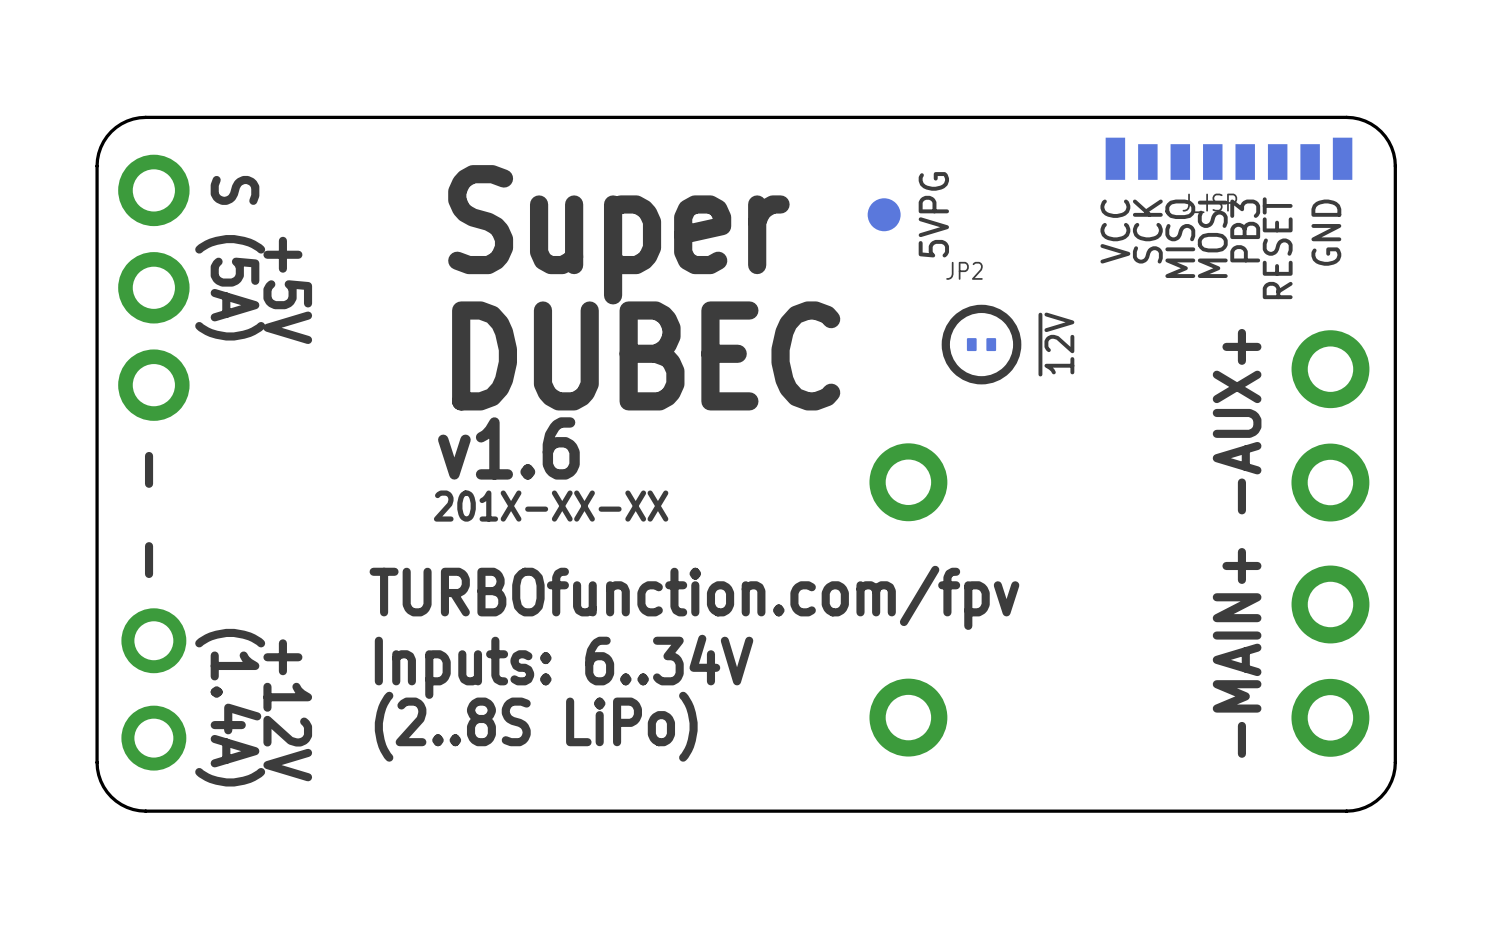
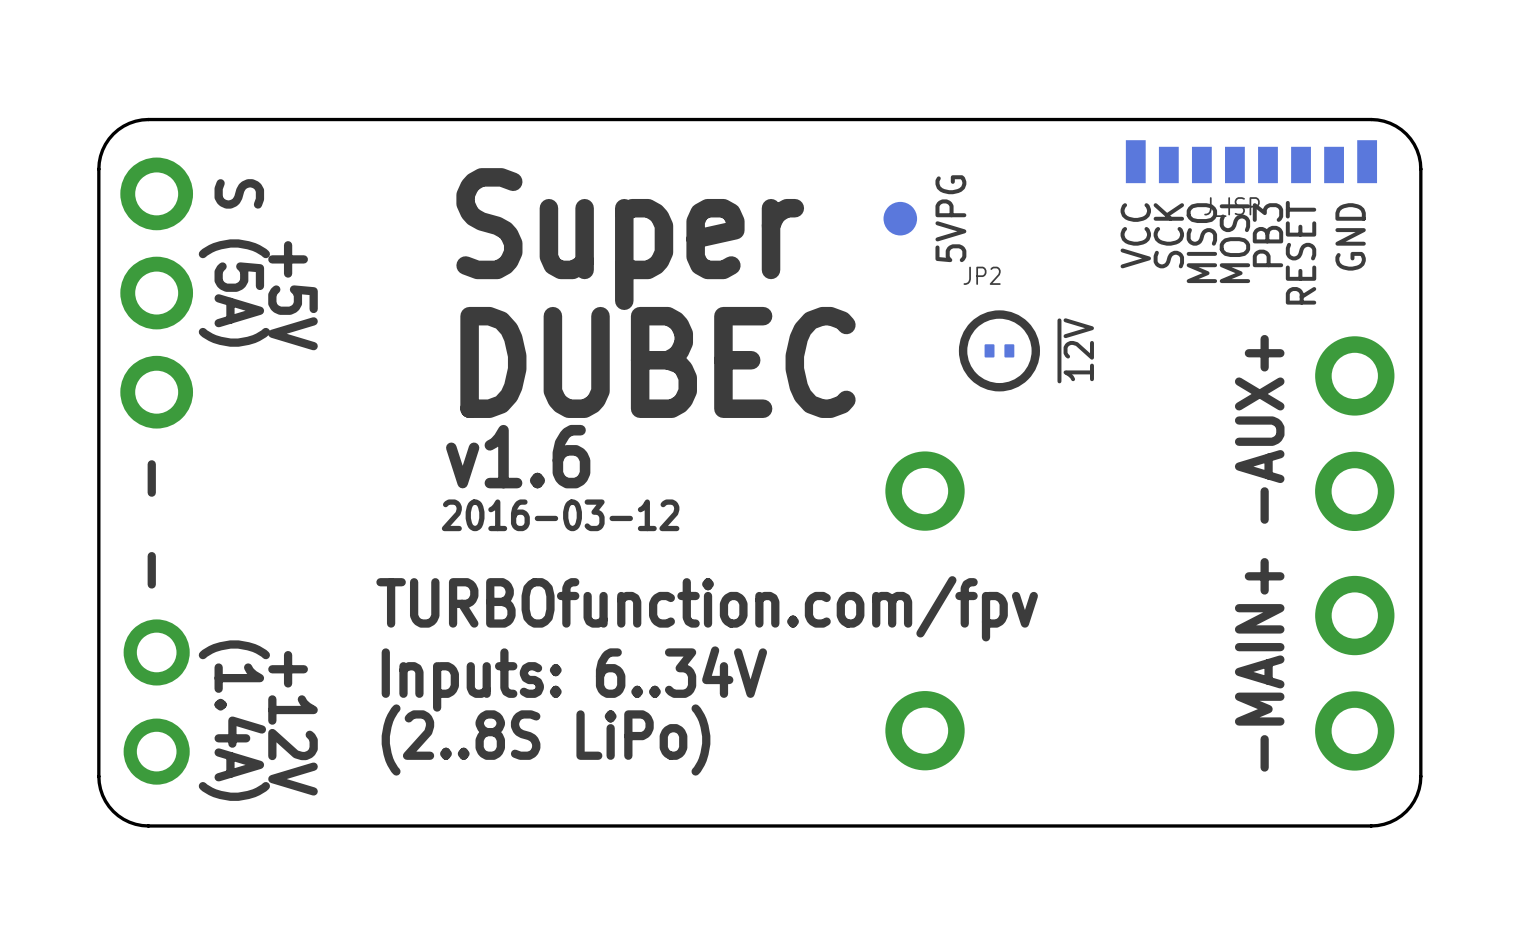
text: 201X-XX-XX (551, 506) -> 2016-03-12 (560, 515)

